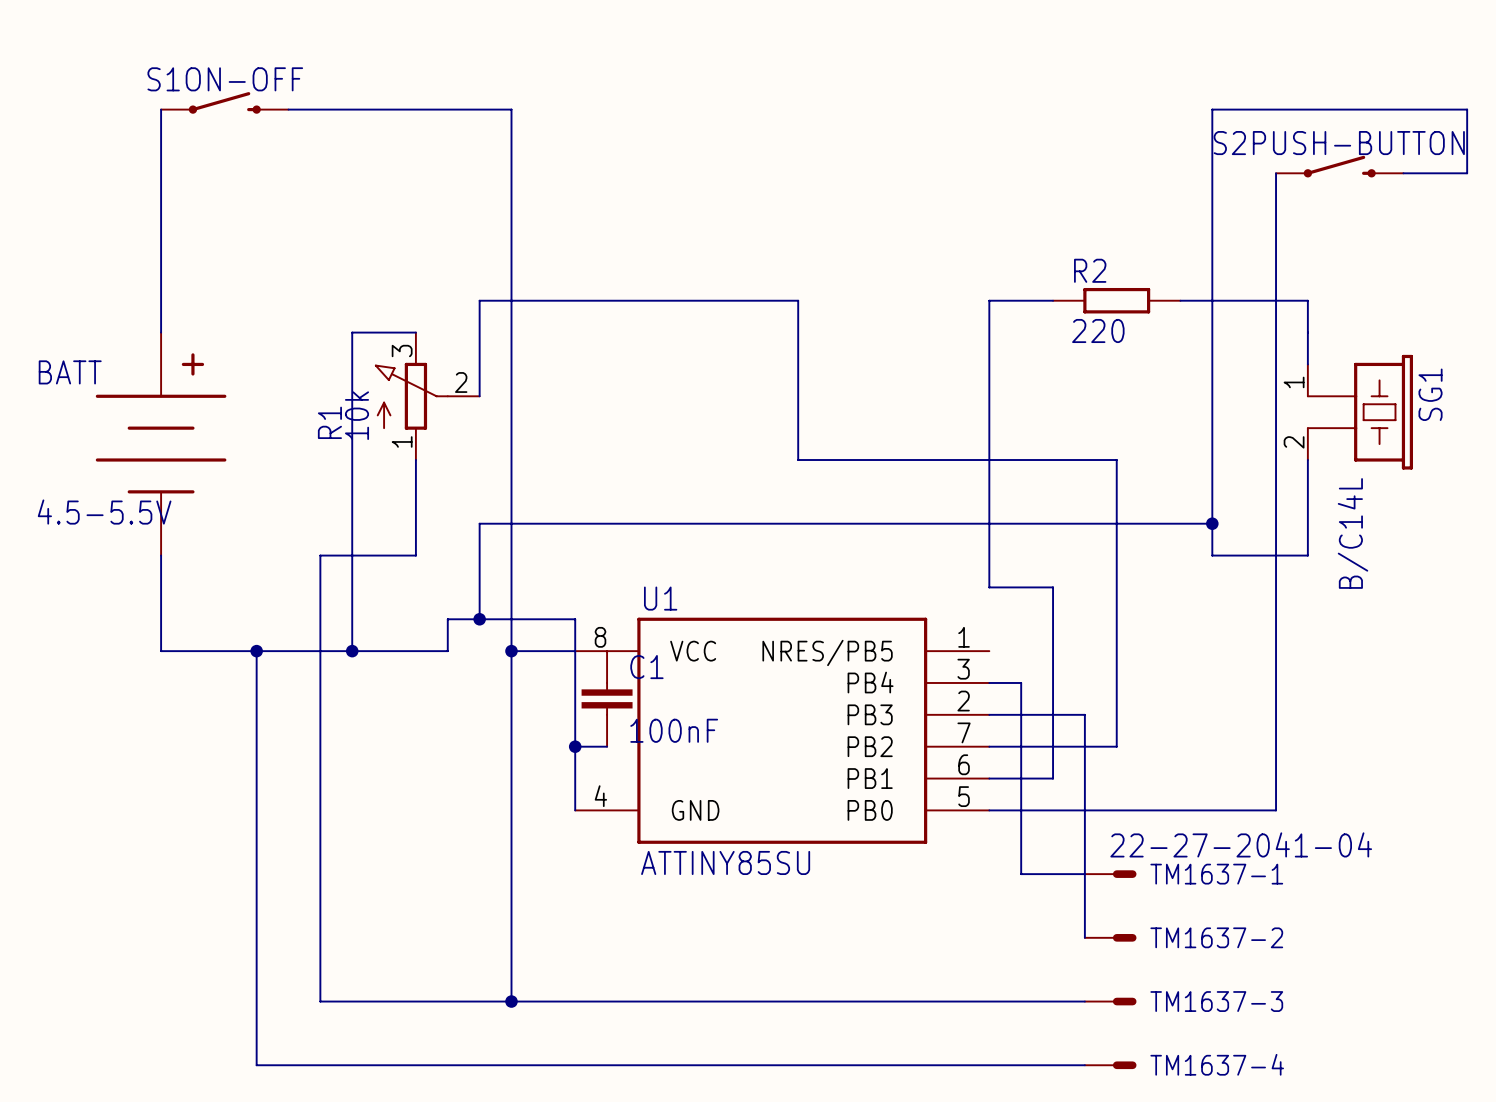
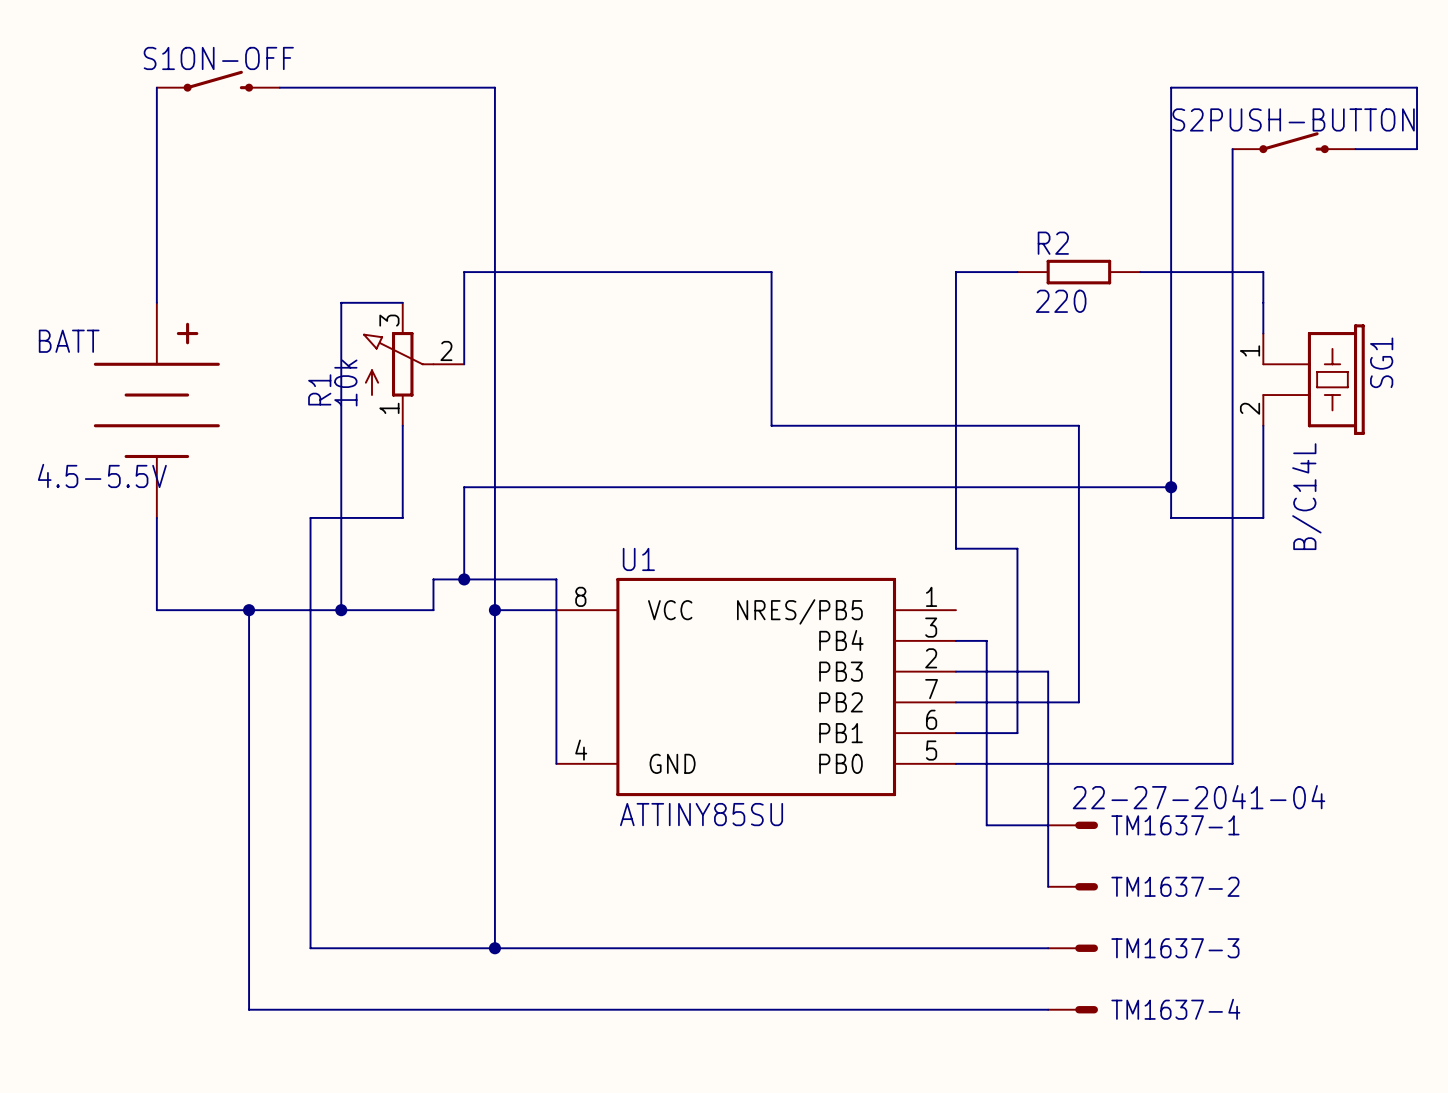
C1: 100nF (607, 698) -> none
wire: (575, 746) (607, 746) -> none
junction: (575, 746) -> none

